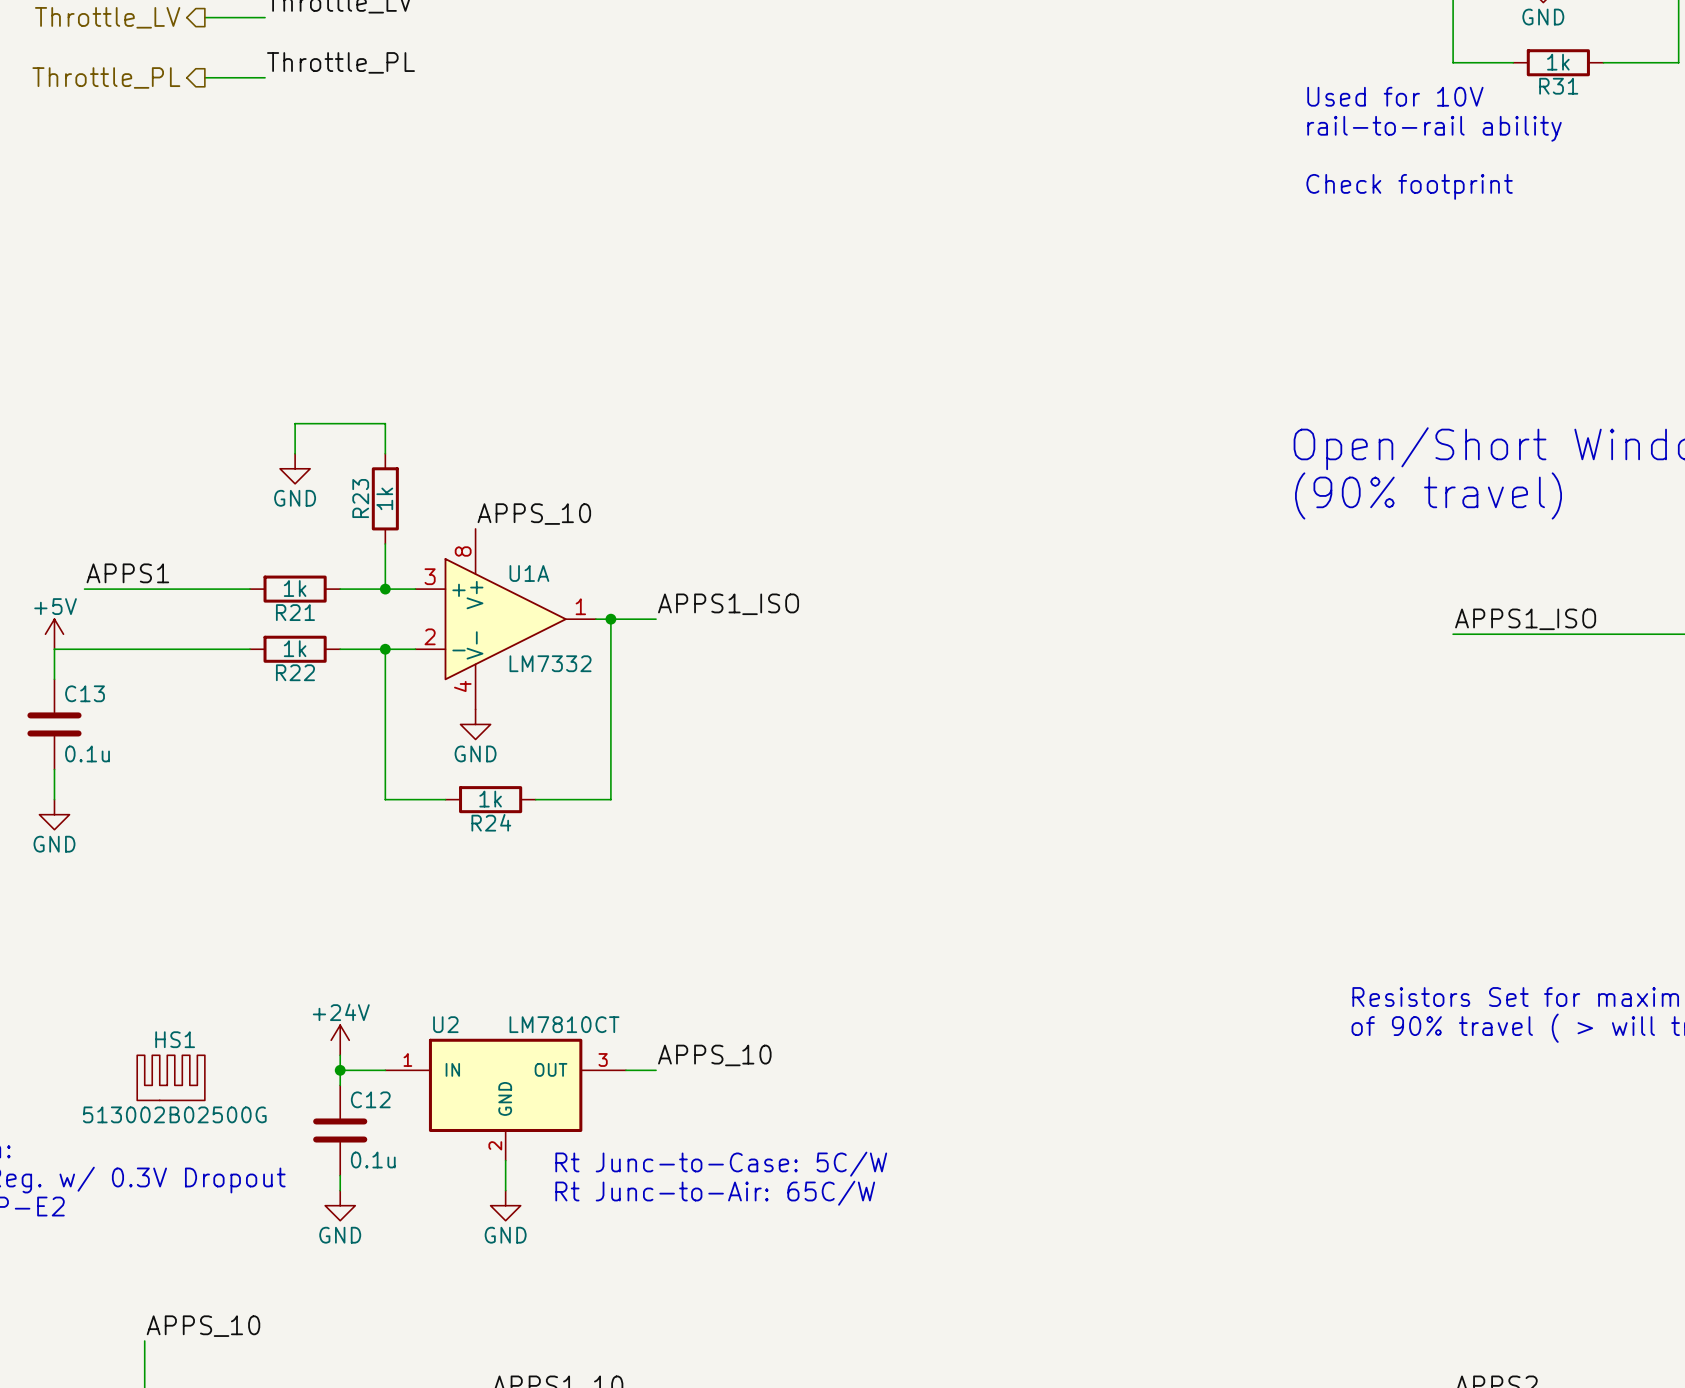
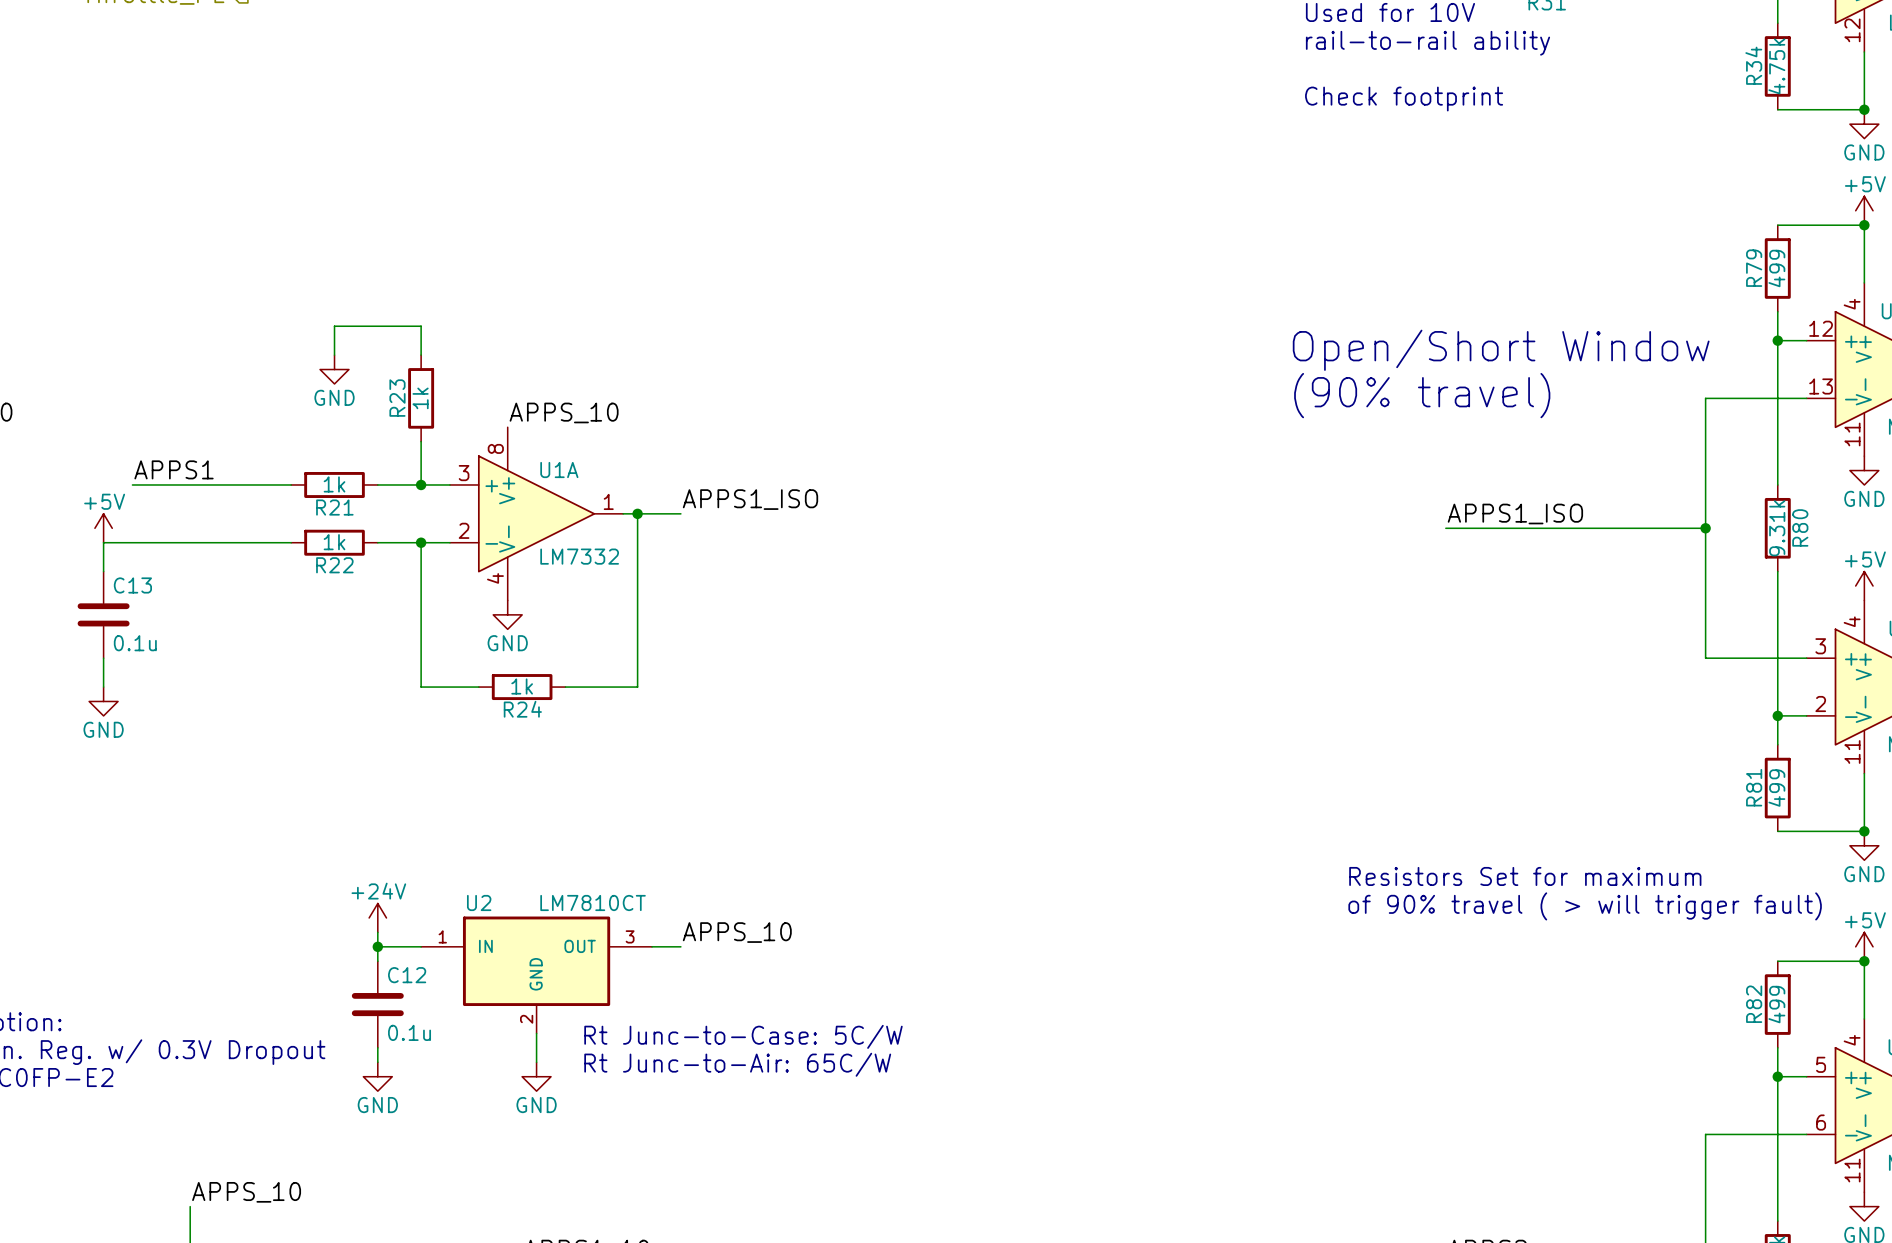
HS1: 513002B02500G (171, 1077) -> none

